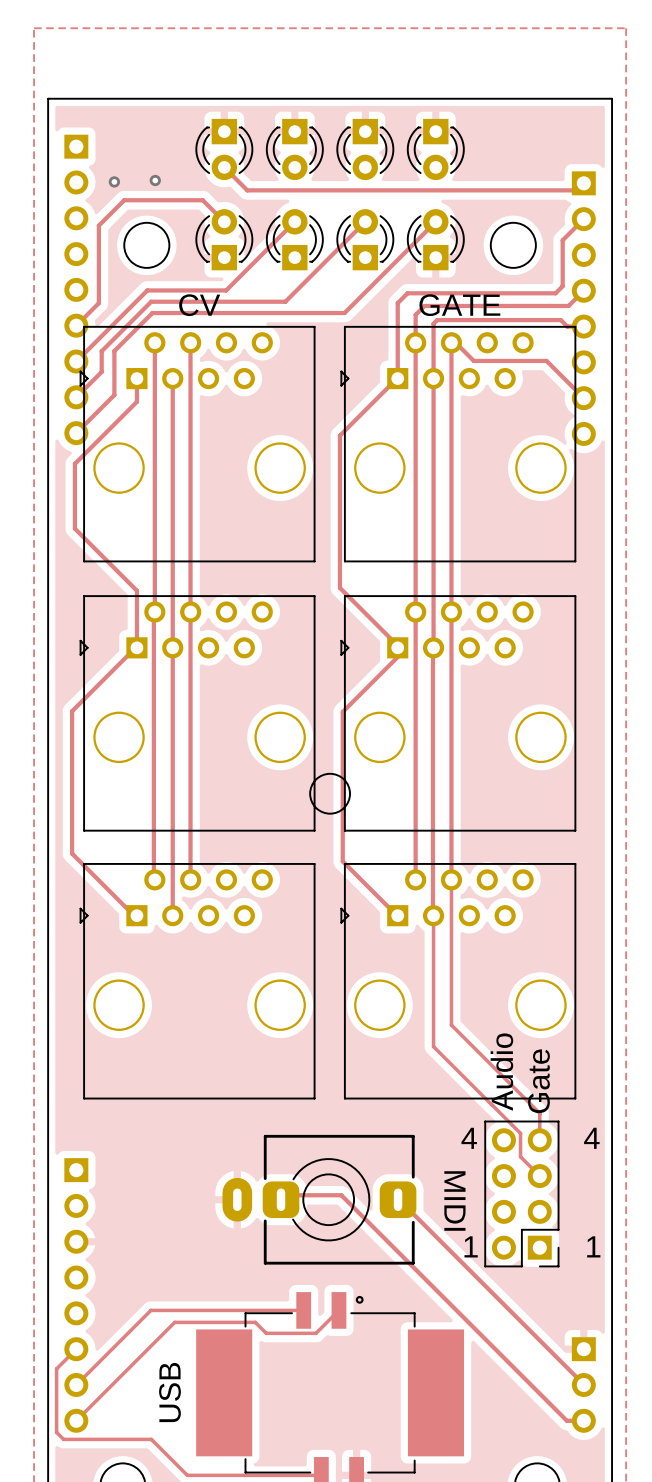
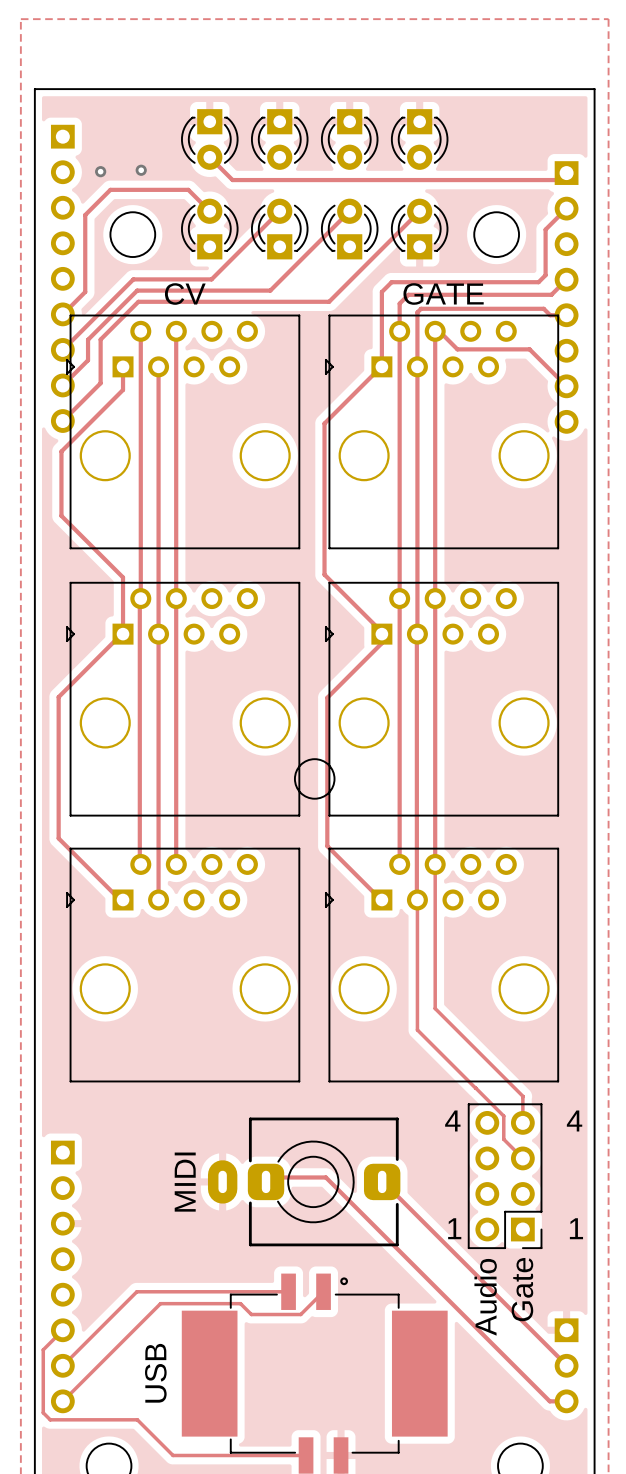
text position: Audio (501, 1072) -> Audio (485, 1297)
text position: Gate (538, 1081) -> Gate (522, 1289)
text rotation: 0° (454, 1201) -> 180° (185, 1182)
text position: MIDI (454, 1201) -> MIDI (185, 1182)

